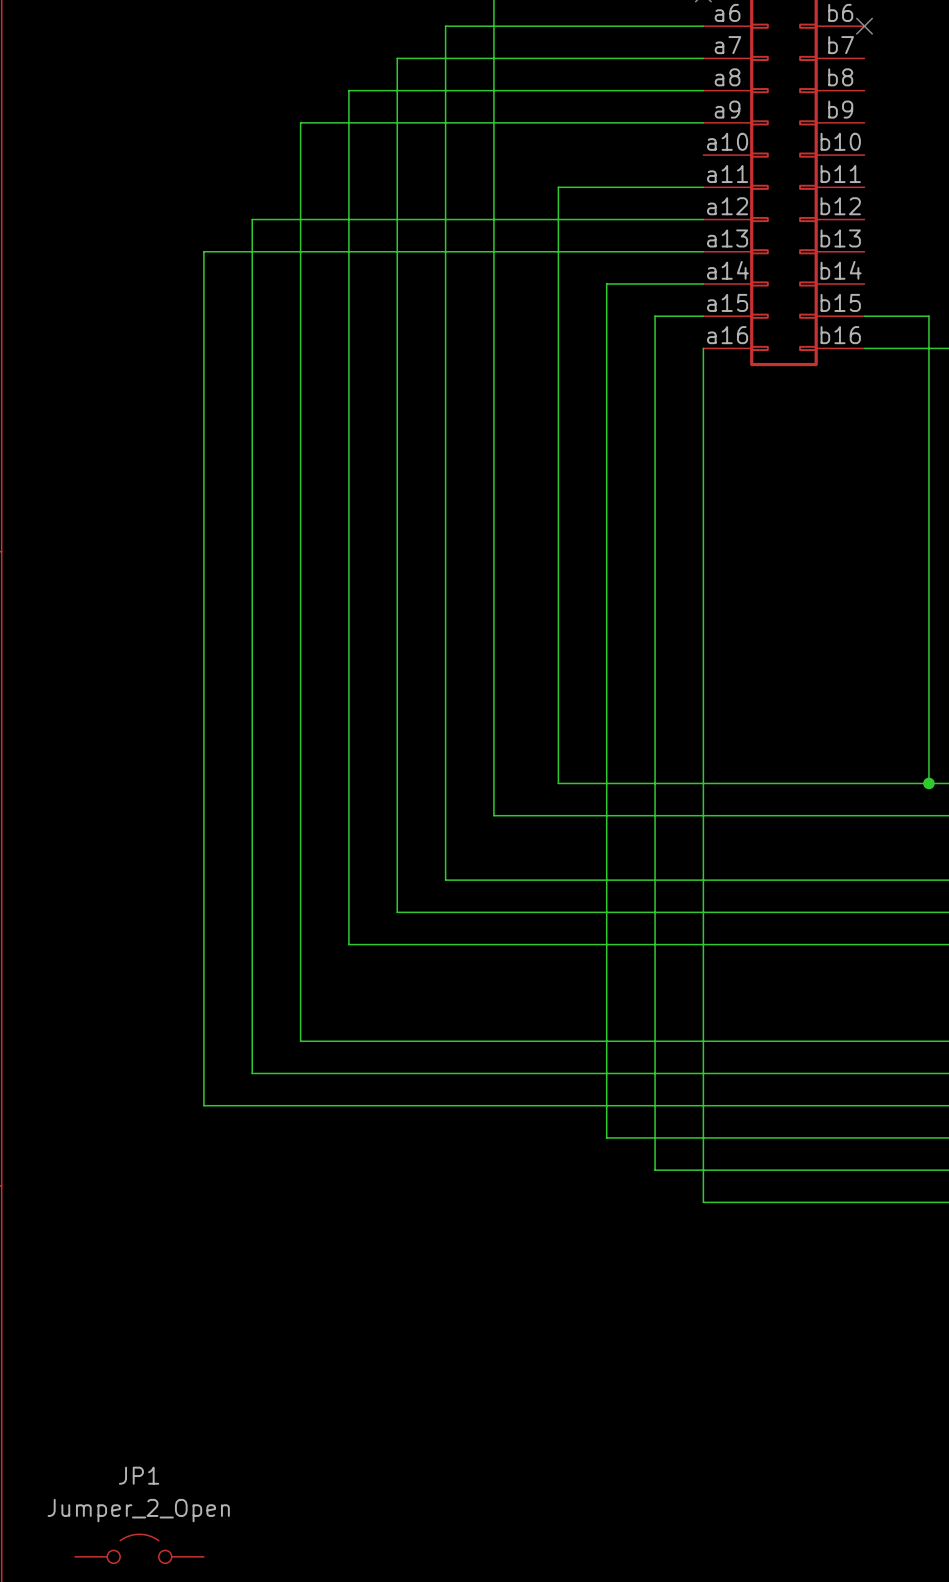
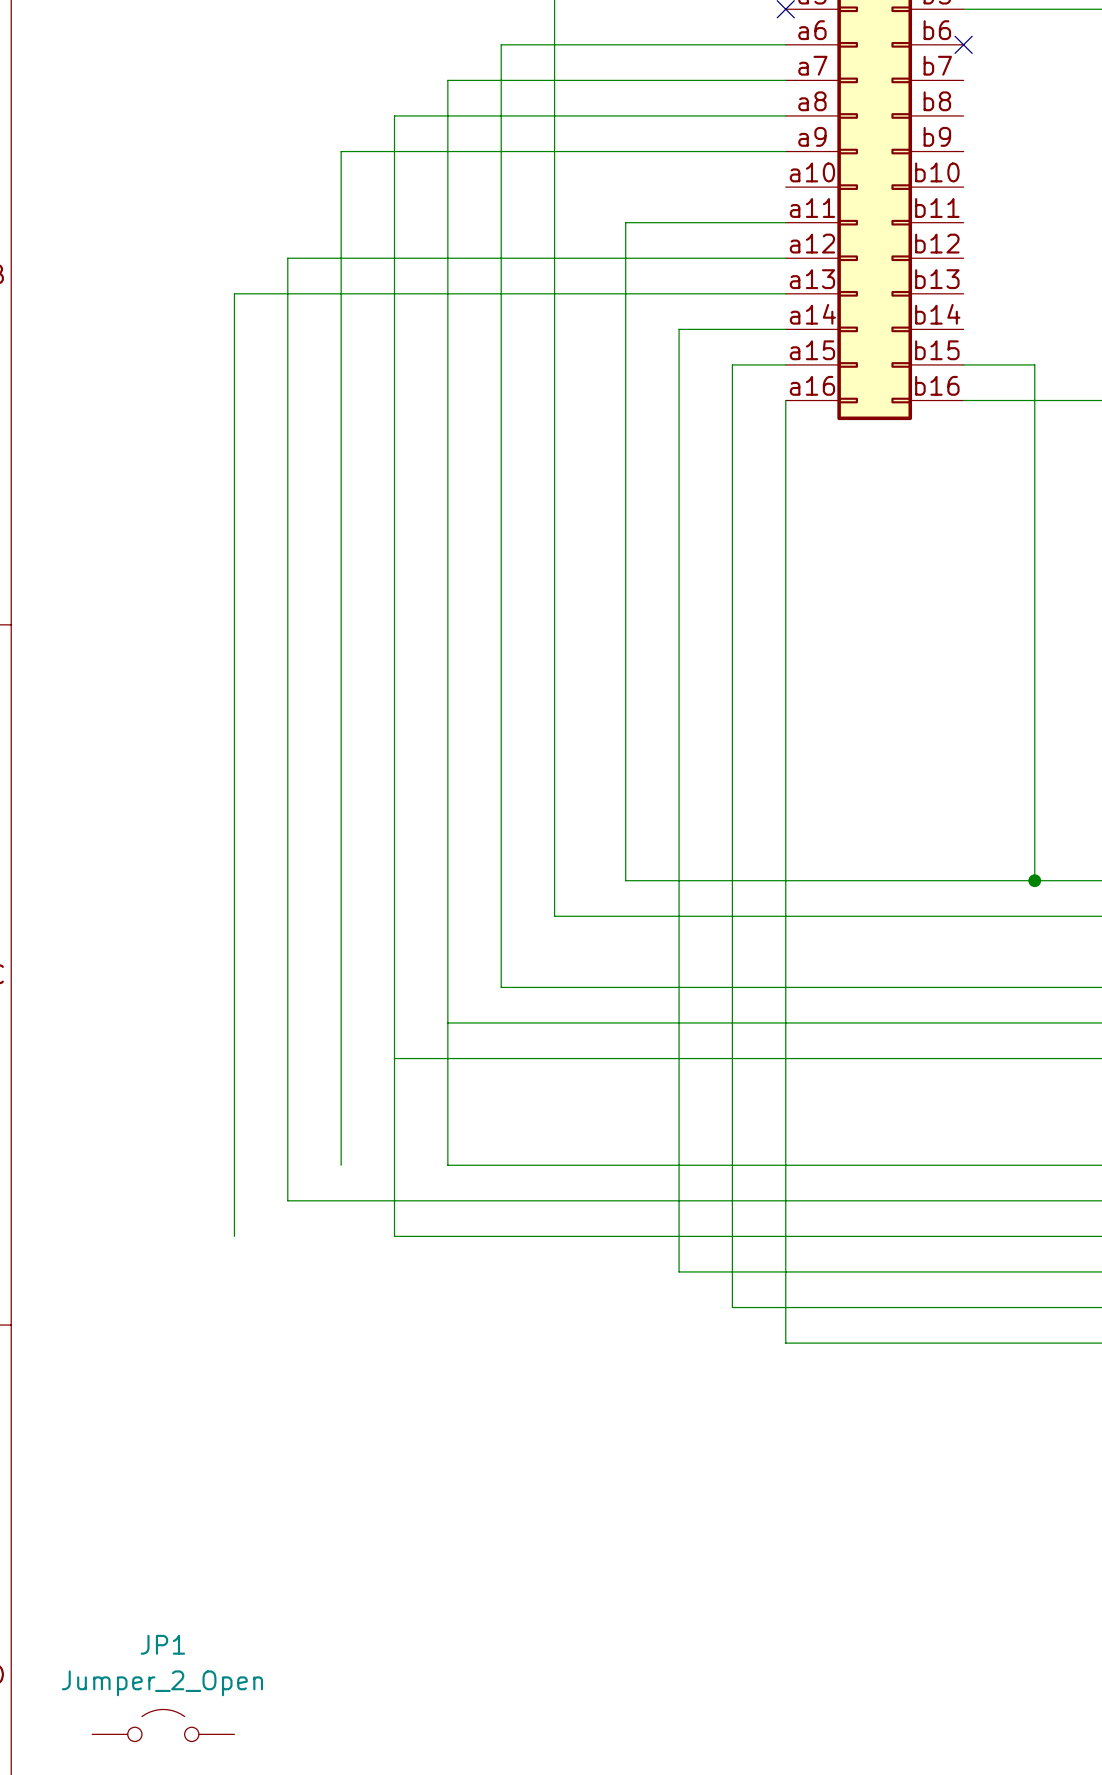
wire: (300, 1041) (397, 1041) -> (447, 1022) (447, 1165)
wire: (203, 1105) (348, 1105) -> (394, 1058) (394, 1236)

